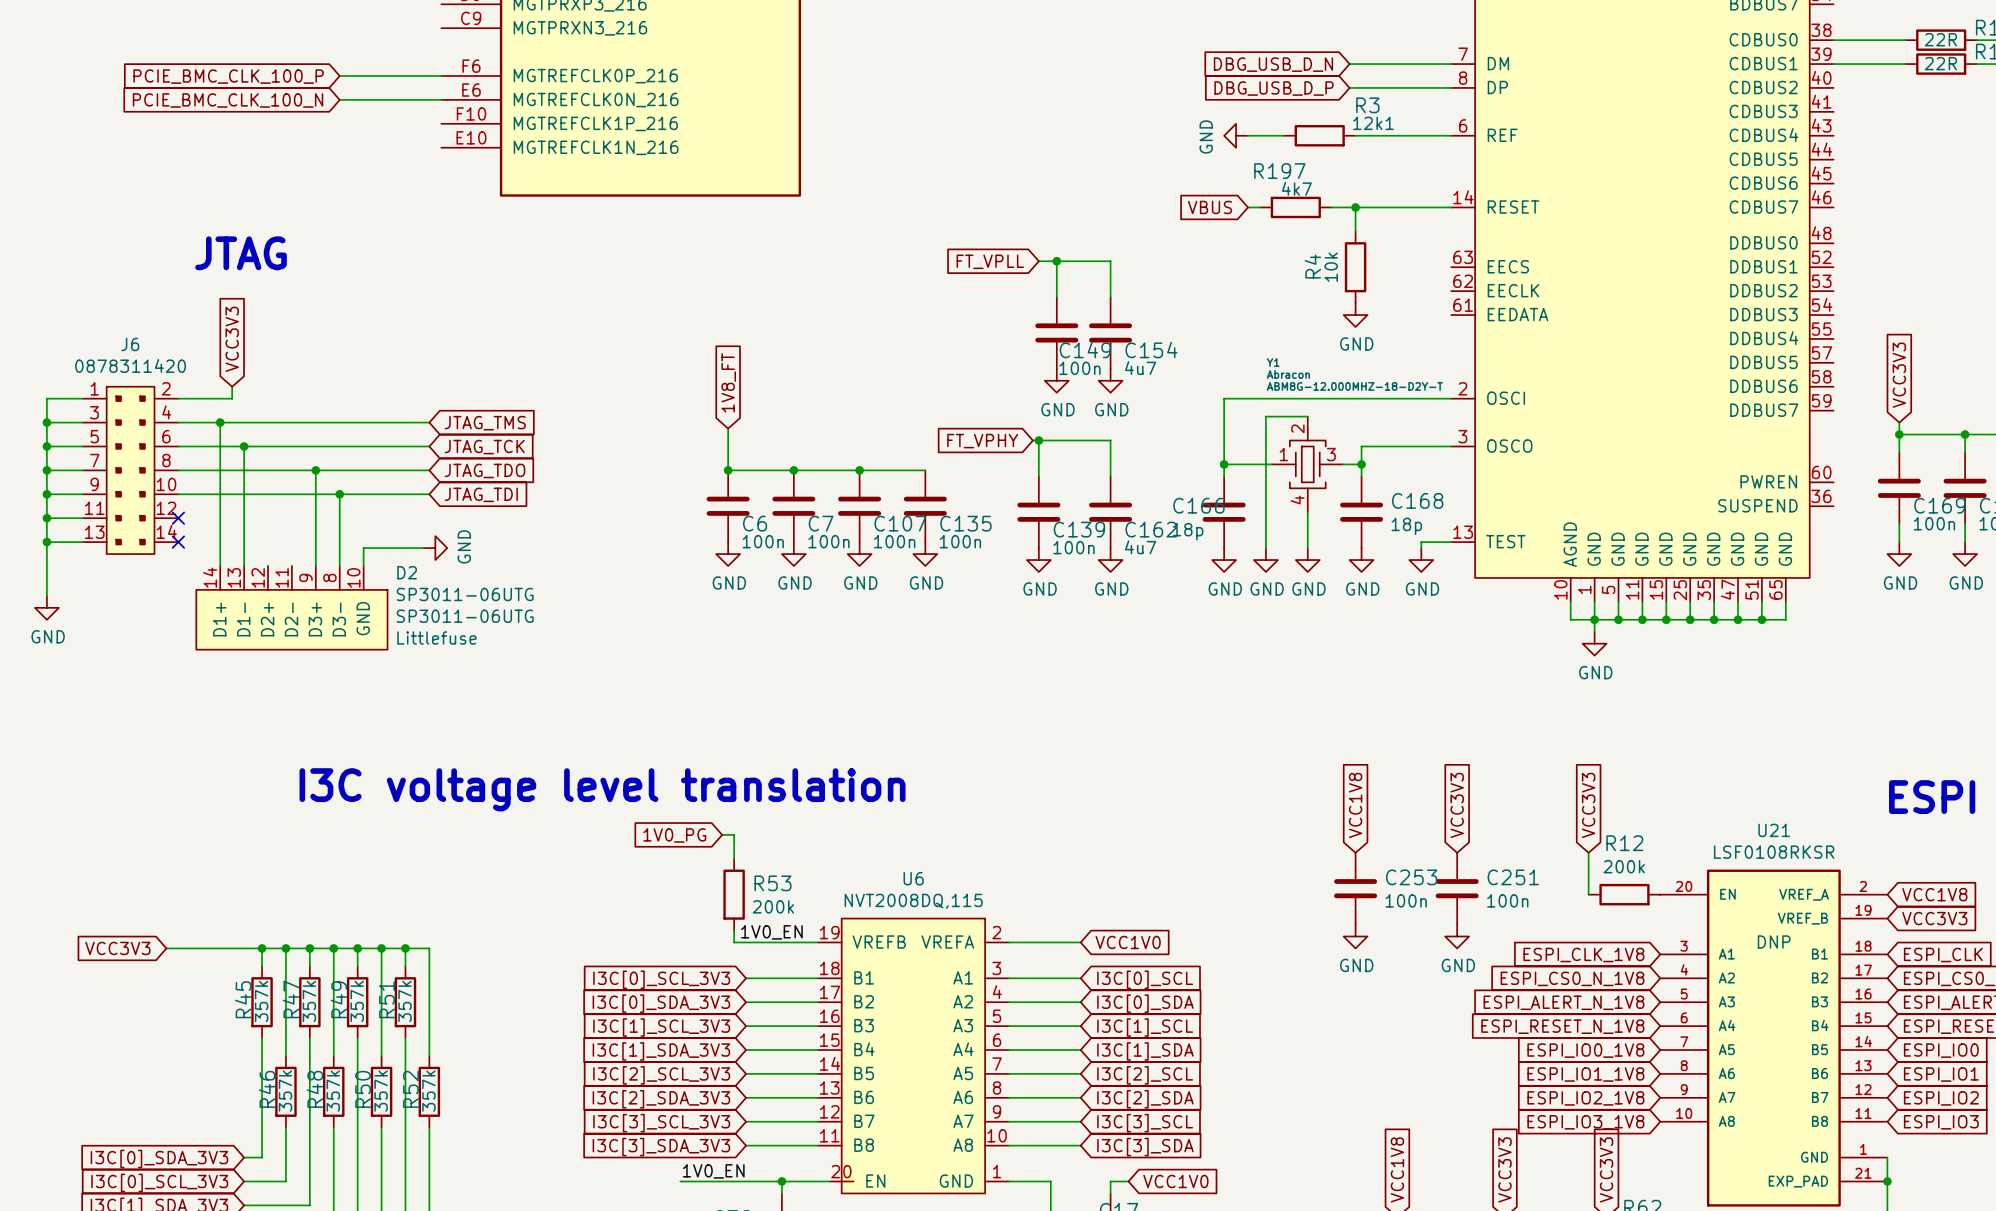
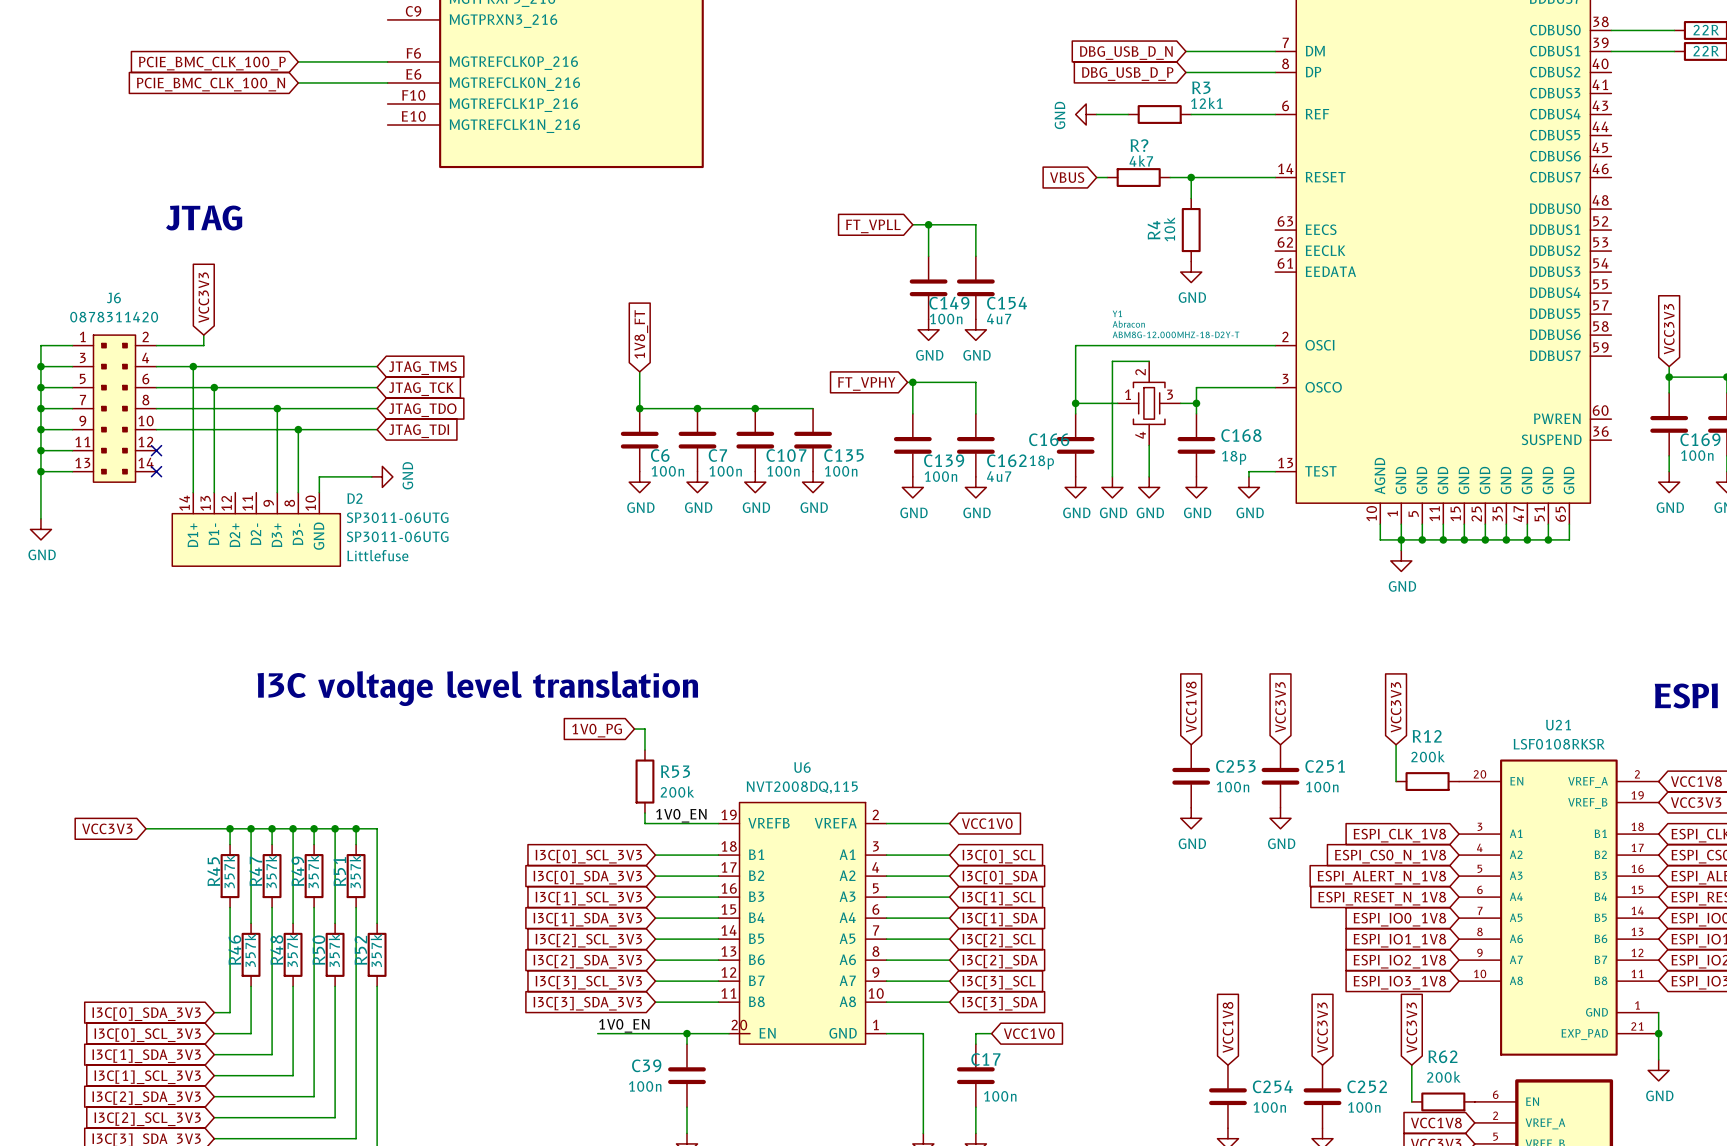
R197 name: R197 (1279, 171) -> R? (1139, 145)
U21 text: DNP (1774, 942) -> none

